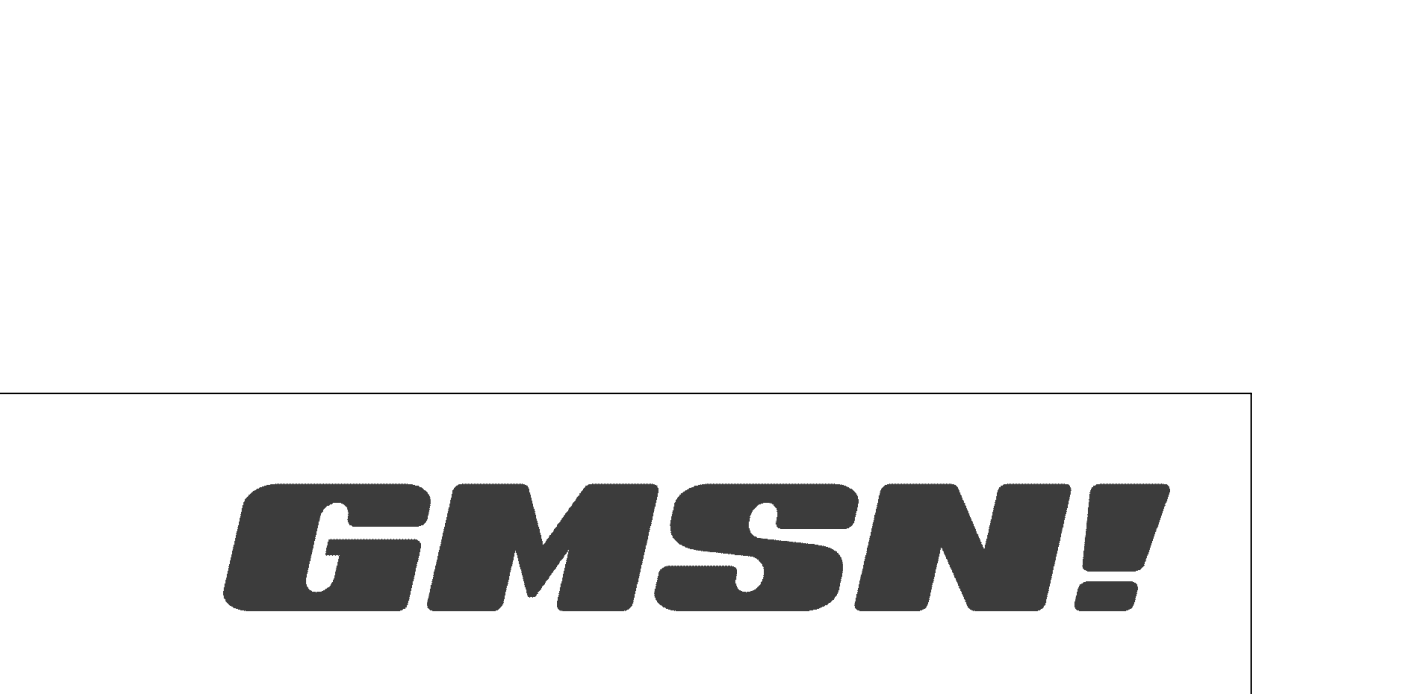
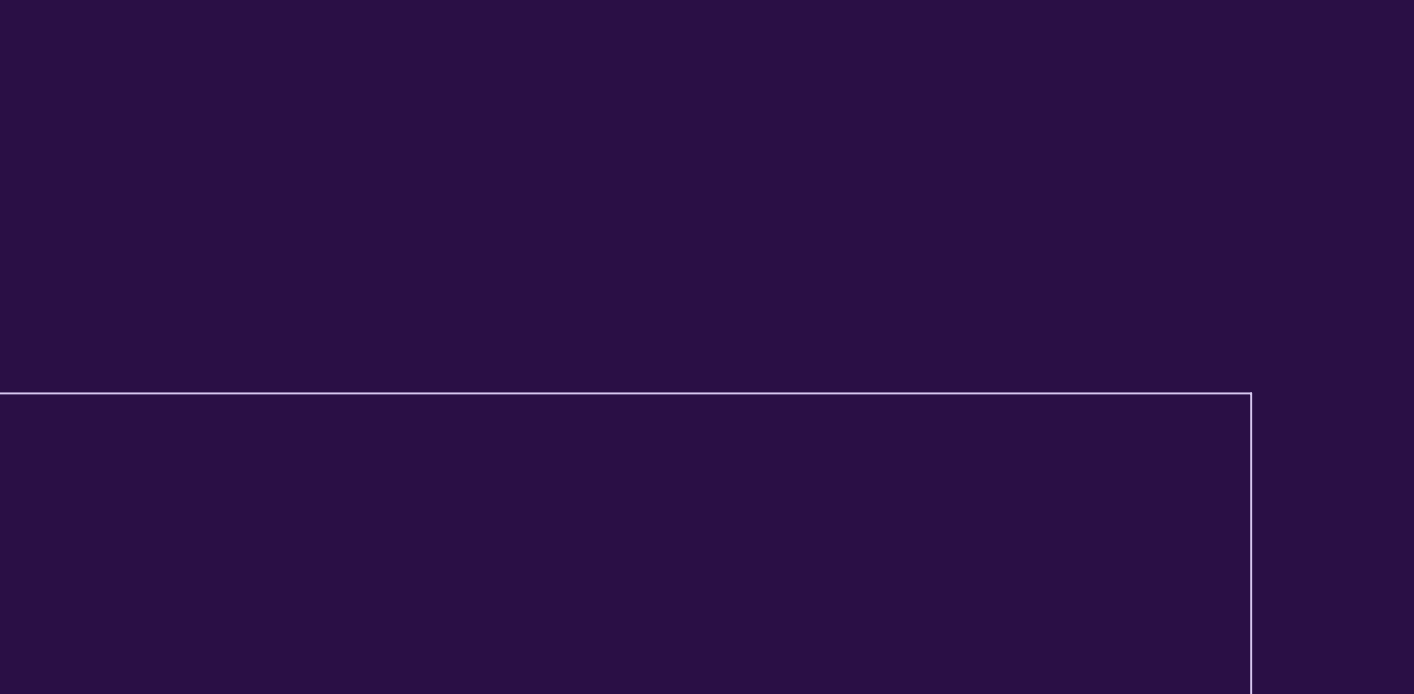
drawing: [223, 483, 1171, 612] -> none

